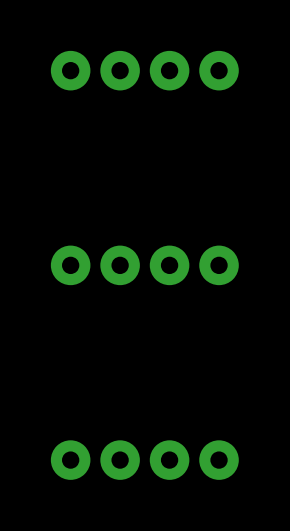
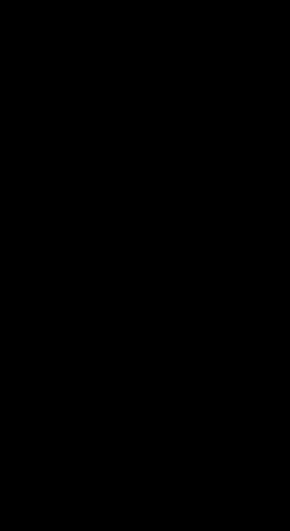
part: (144, 70) -> none
part: (144, 265) -> none
part: (144, 460) -> none

